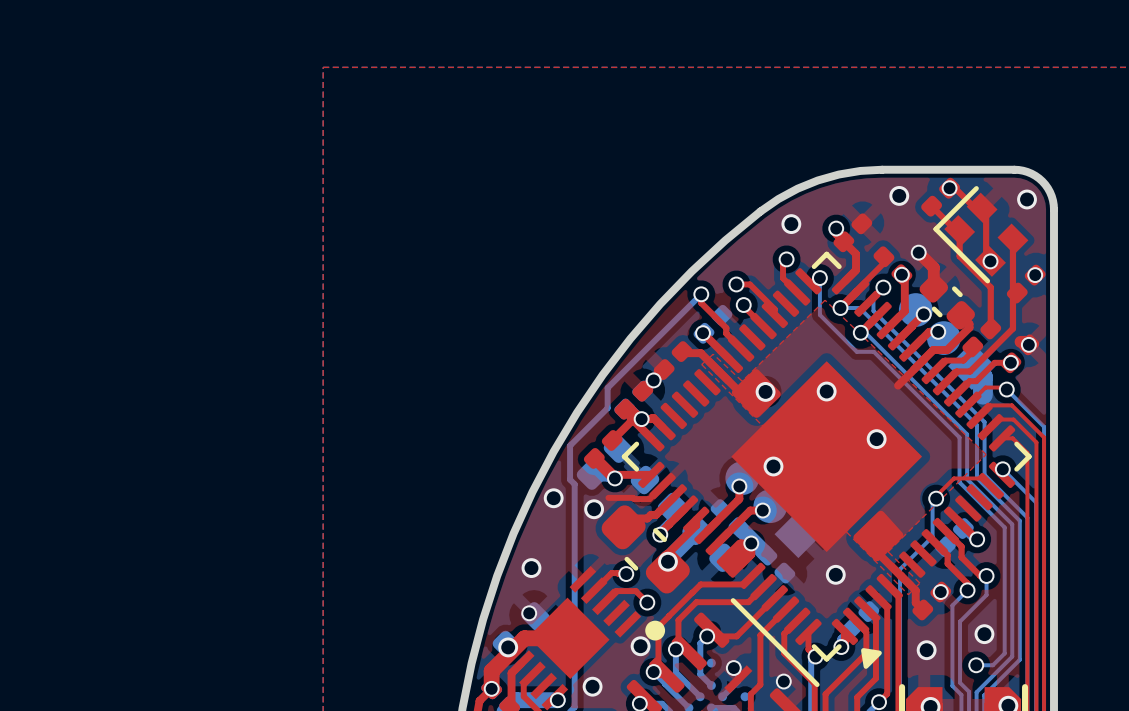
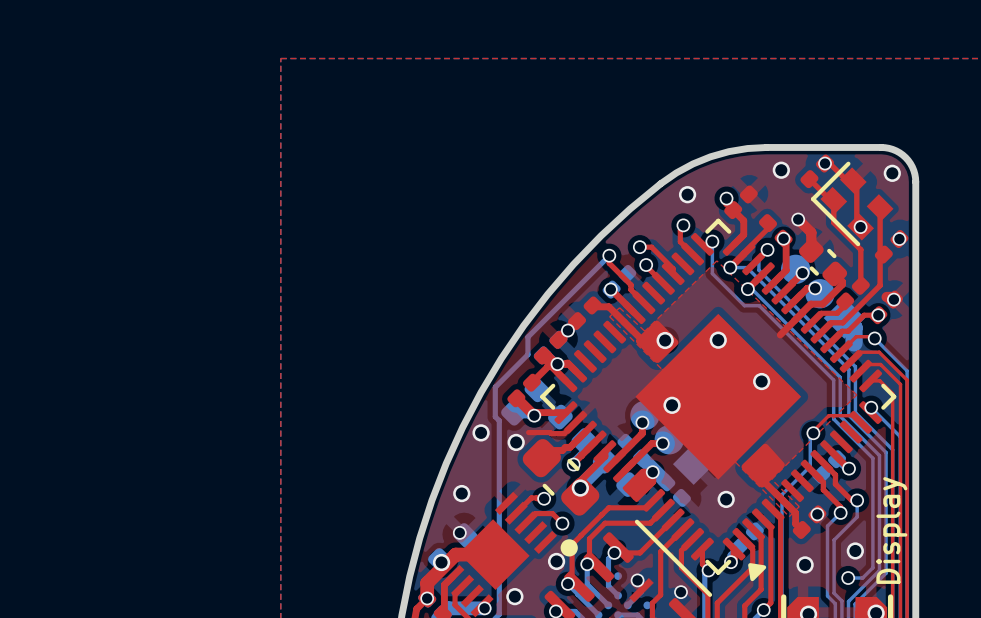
text: none -> Display (891, 530)

